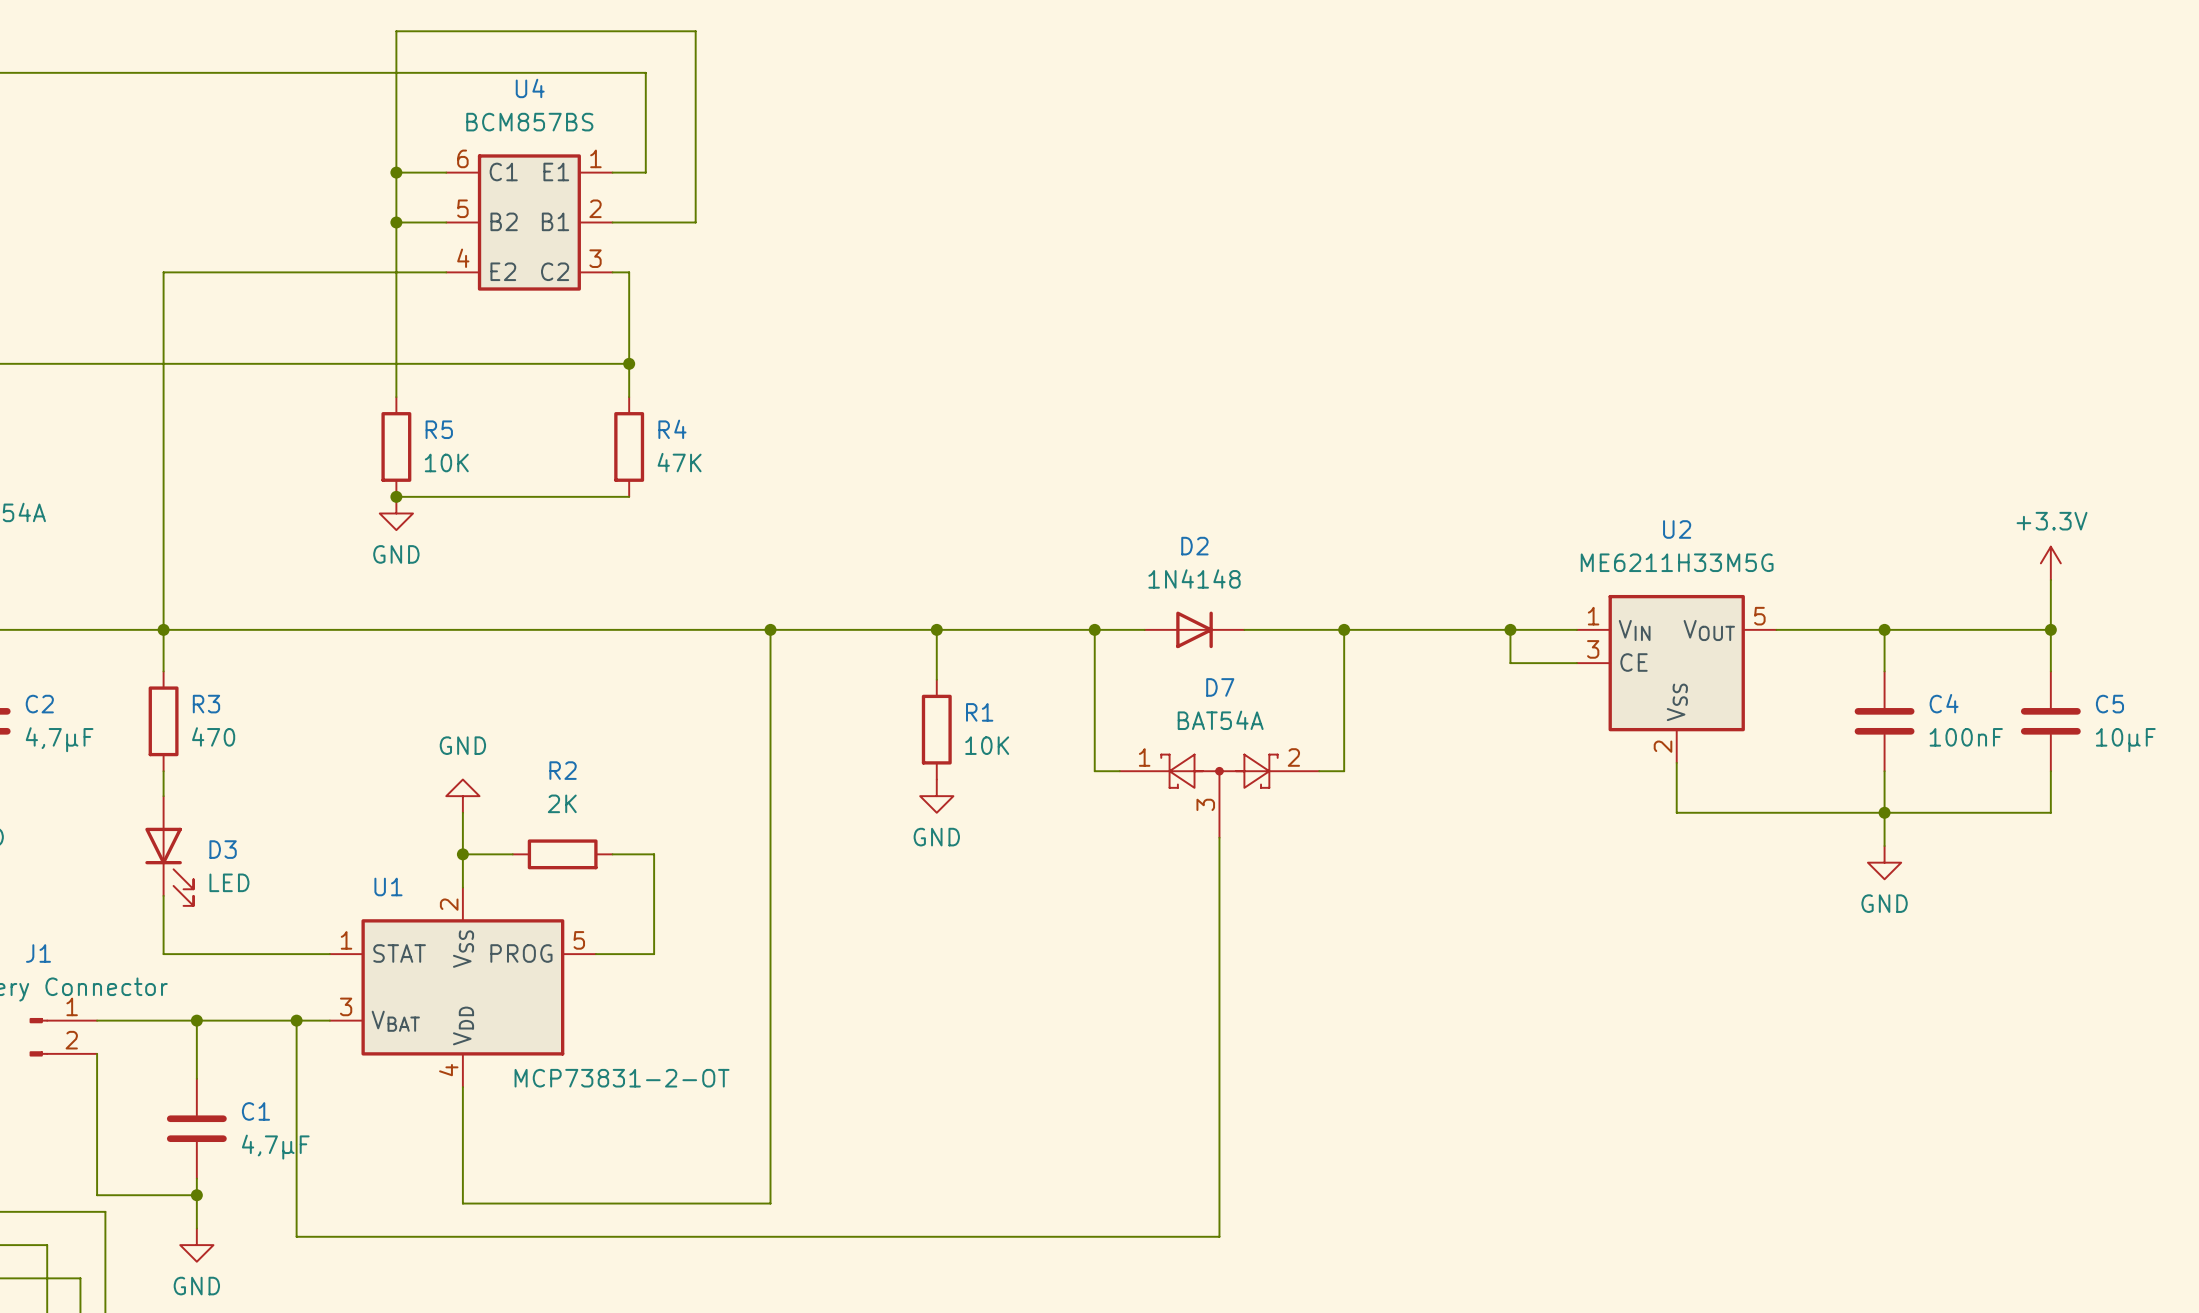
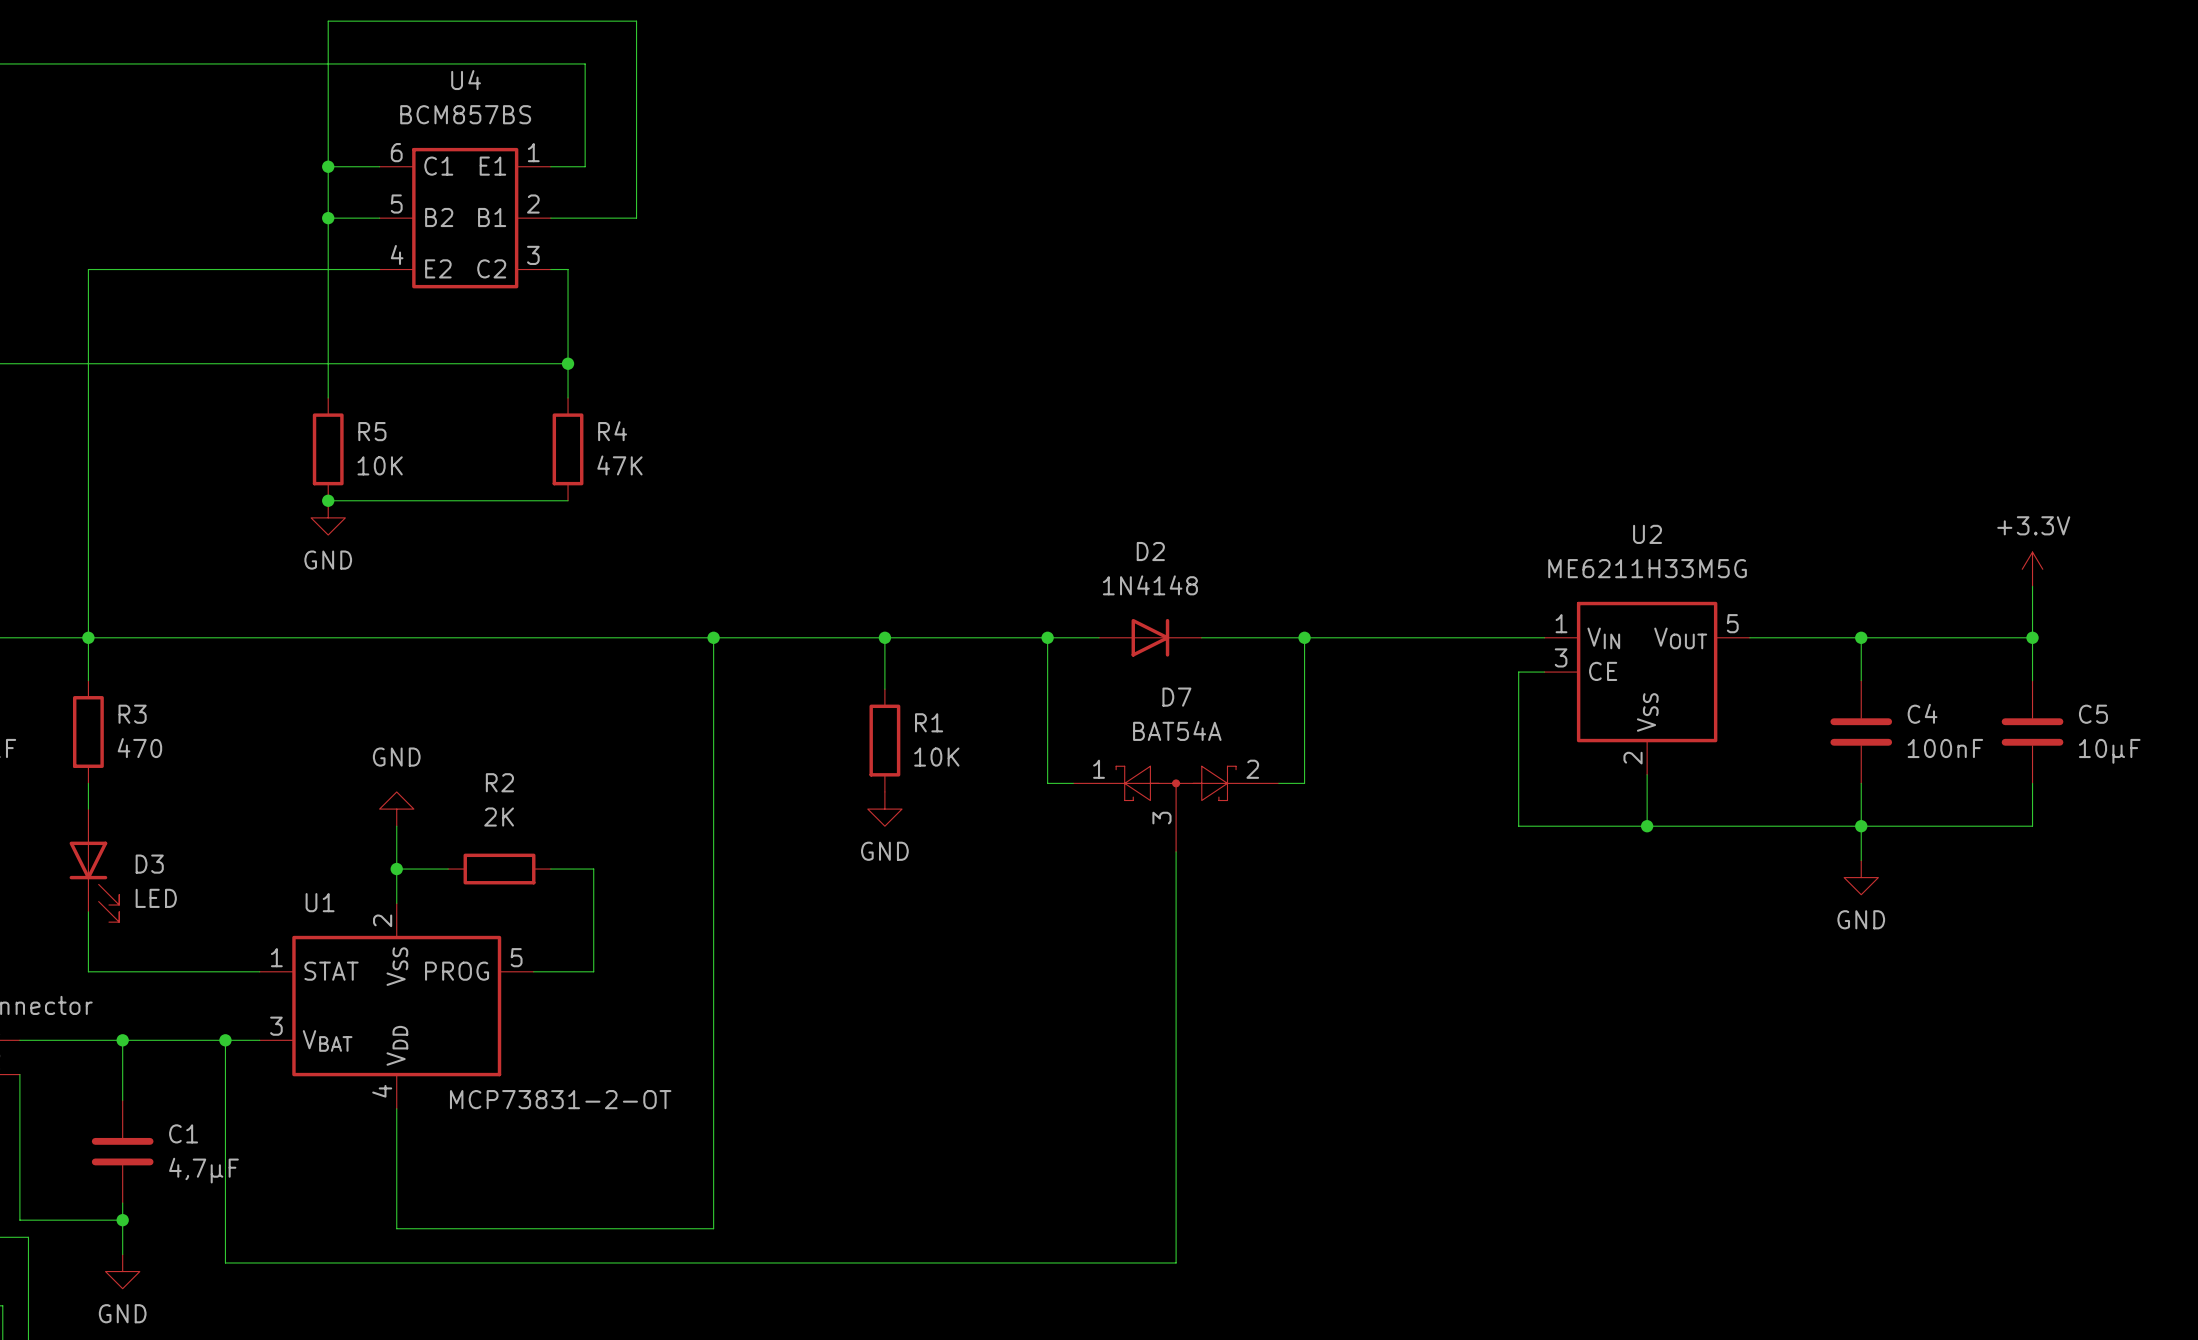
wire: (1510, 629) (1510, 663) (1552, 663) -> (1647, 826) (1518, 826) (1518, 672)
junction: (1510, 629) -> none
junction: none -> (1647, 826)

